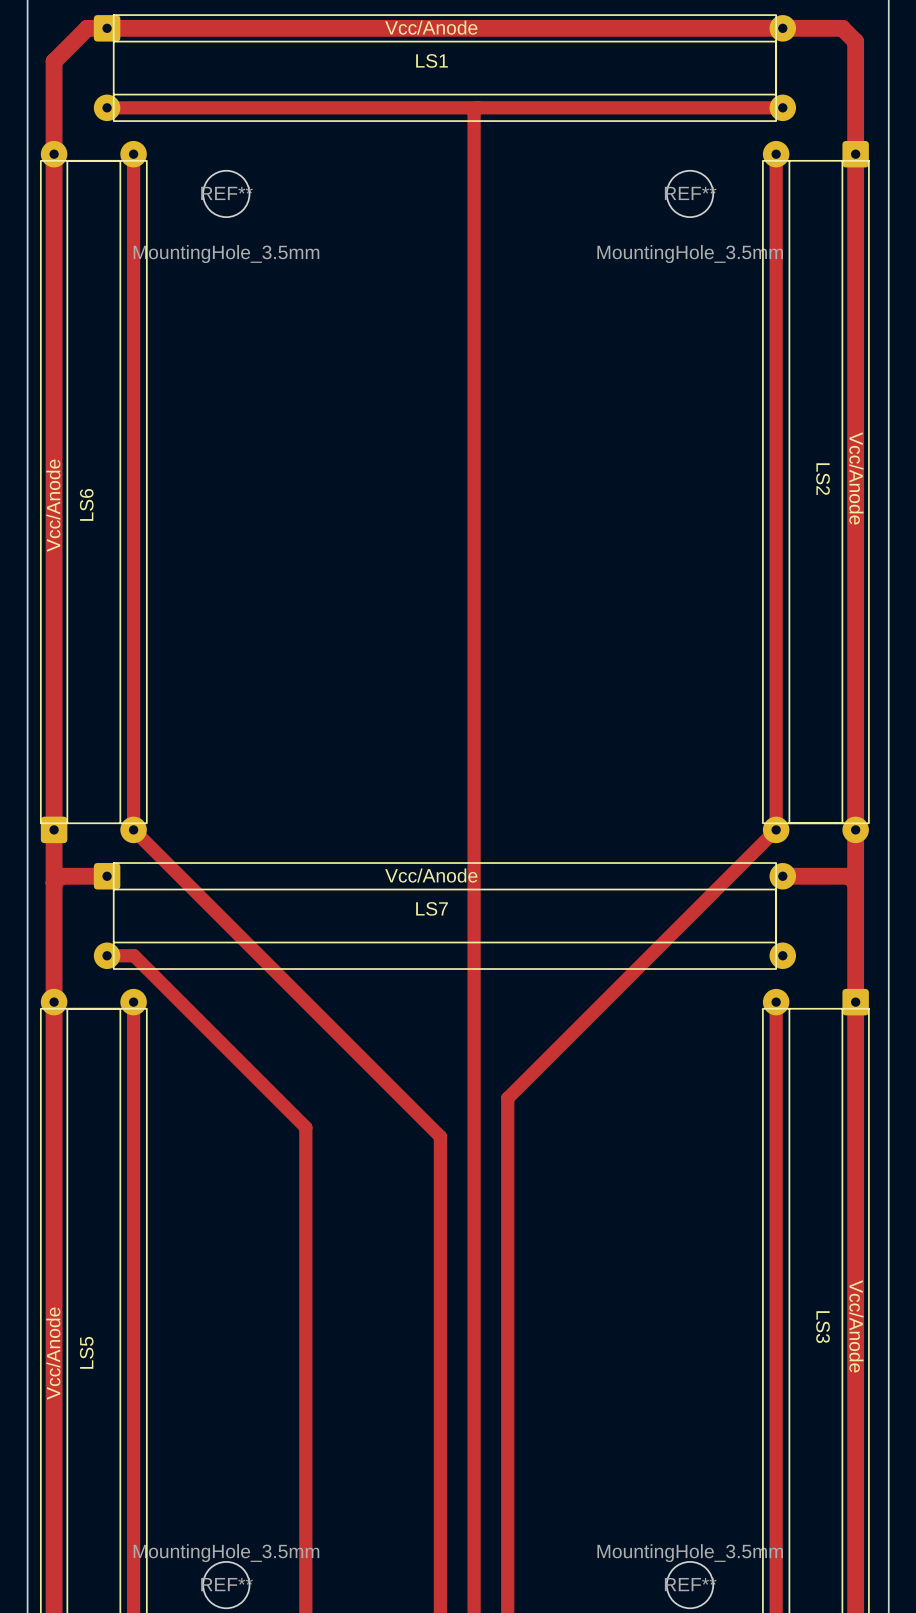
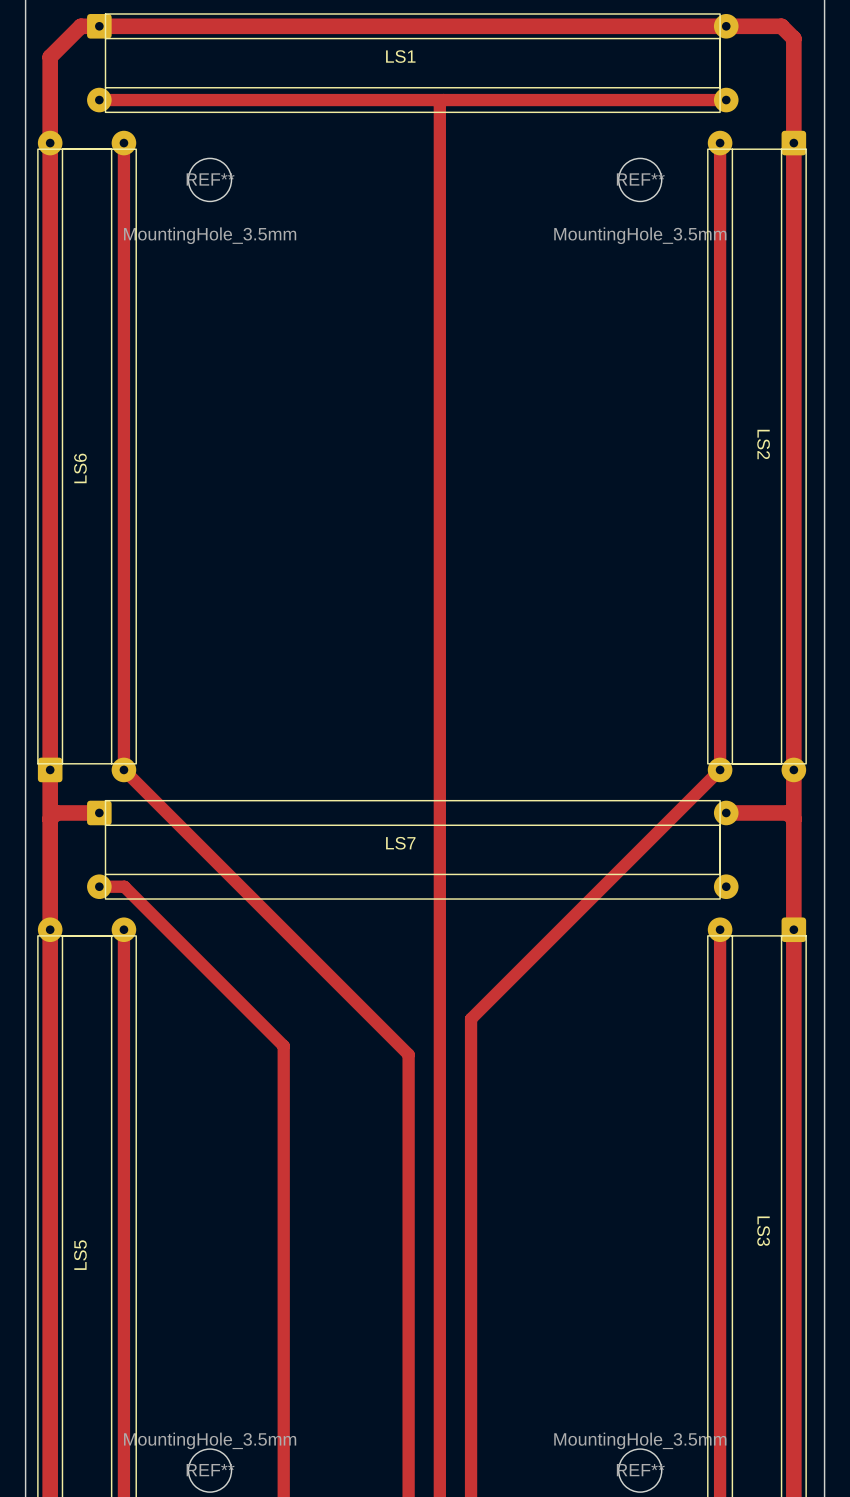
LS1 text: Vcc/Anode (431, 27) -> none
LS2 text: Vcc/Anode (856, 478) -> none
LS6 text: Vcc/Anode (53, 505) -> none
LS7 text: Vcc/Anode (431, 875) -> none
LS3 text: Vcc/Anode (856, 1326) -> none
LS5 text: Vcc/Anode (53, 1353) -> none

